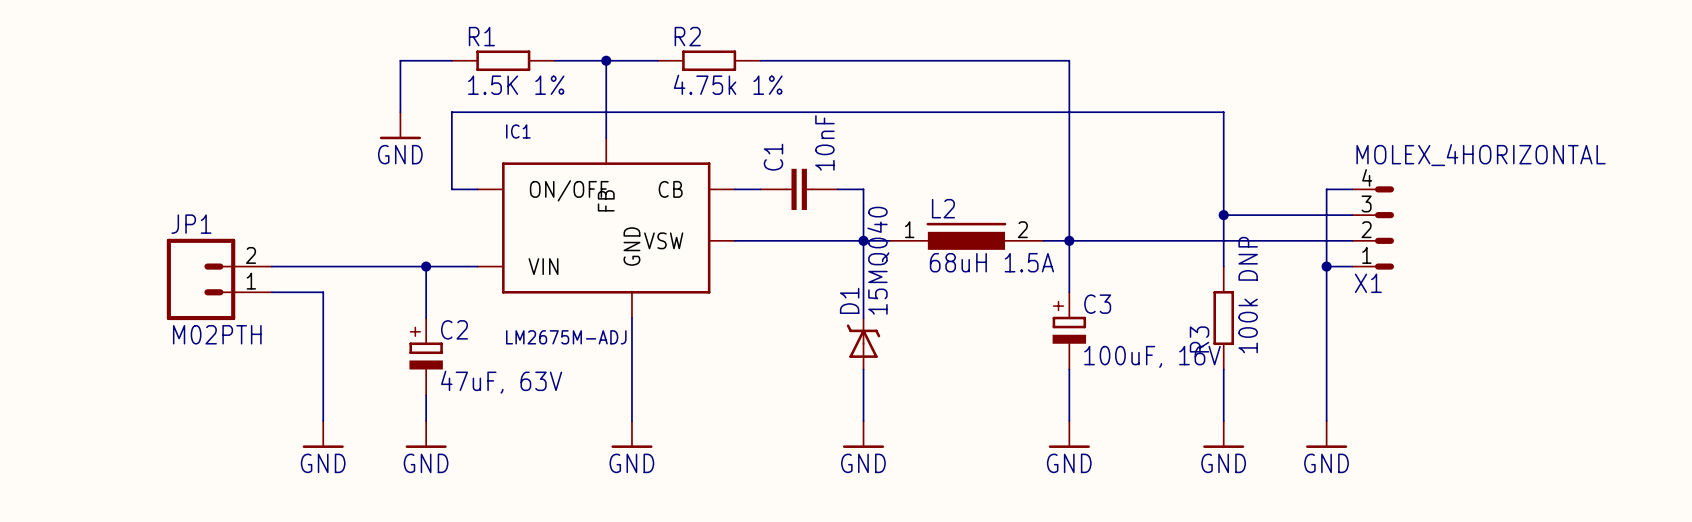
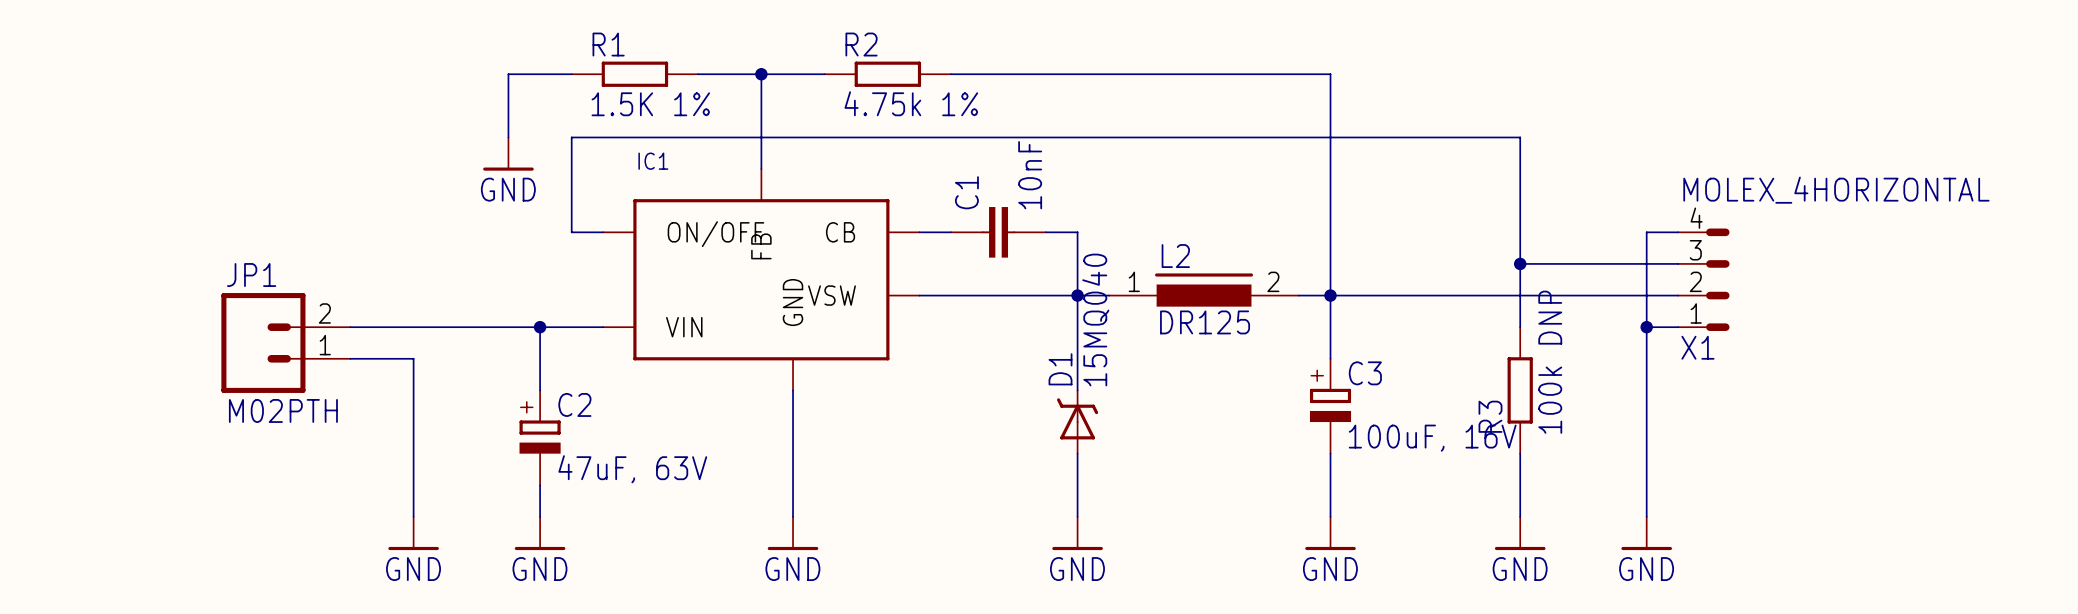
L2 value: 68uH 1.5A (991, 262) -> DR125 (1205, 322)
IC1 value: LM2675M-ADJ (566, 337) -> none

